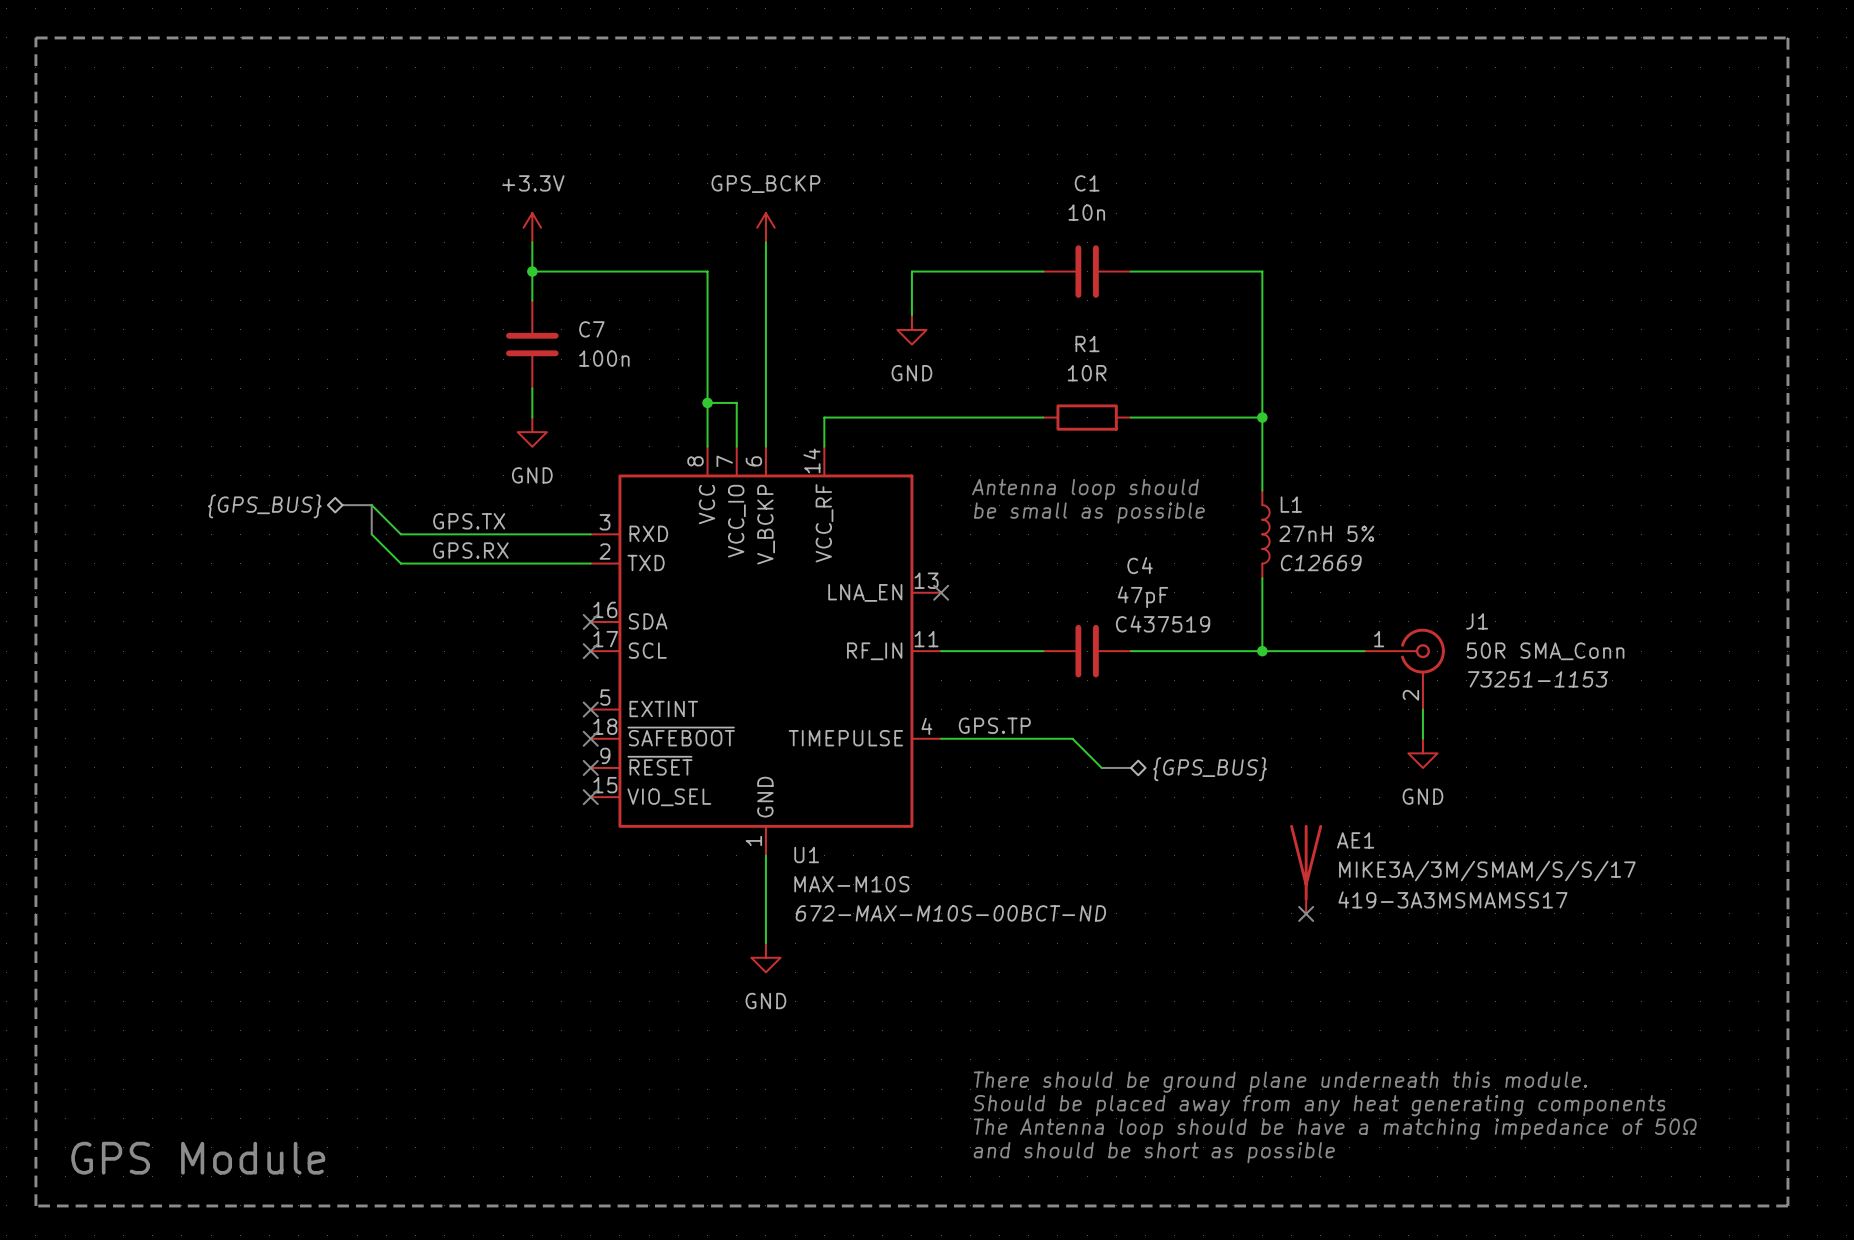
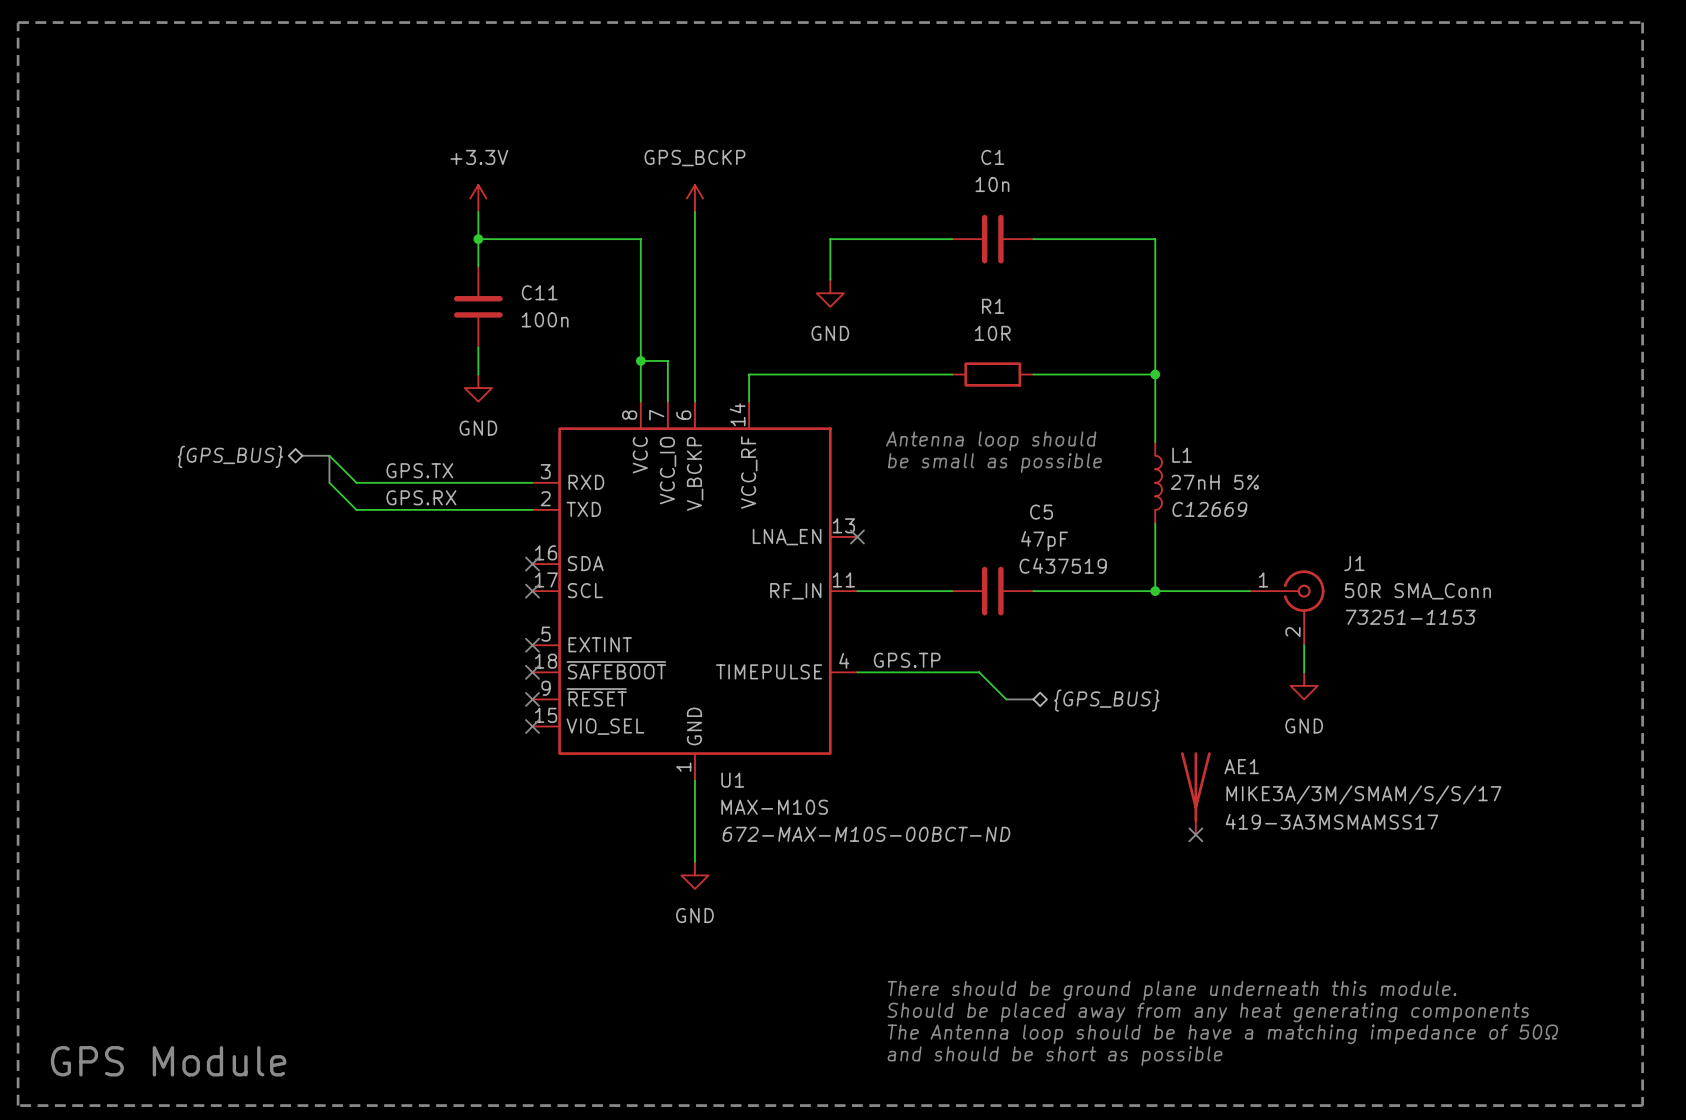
C7 name: C7 (591, 329) -> C11 (539, 292)
C4 name: C4 (1140, 565) -> C5 (1041, 512)

